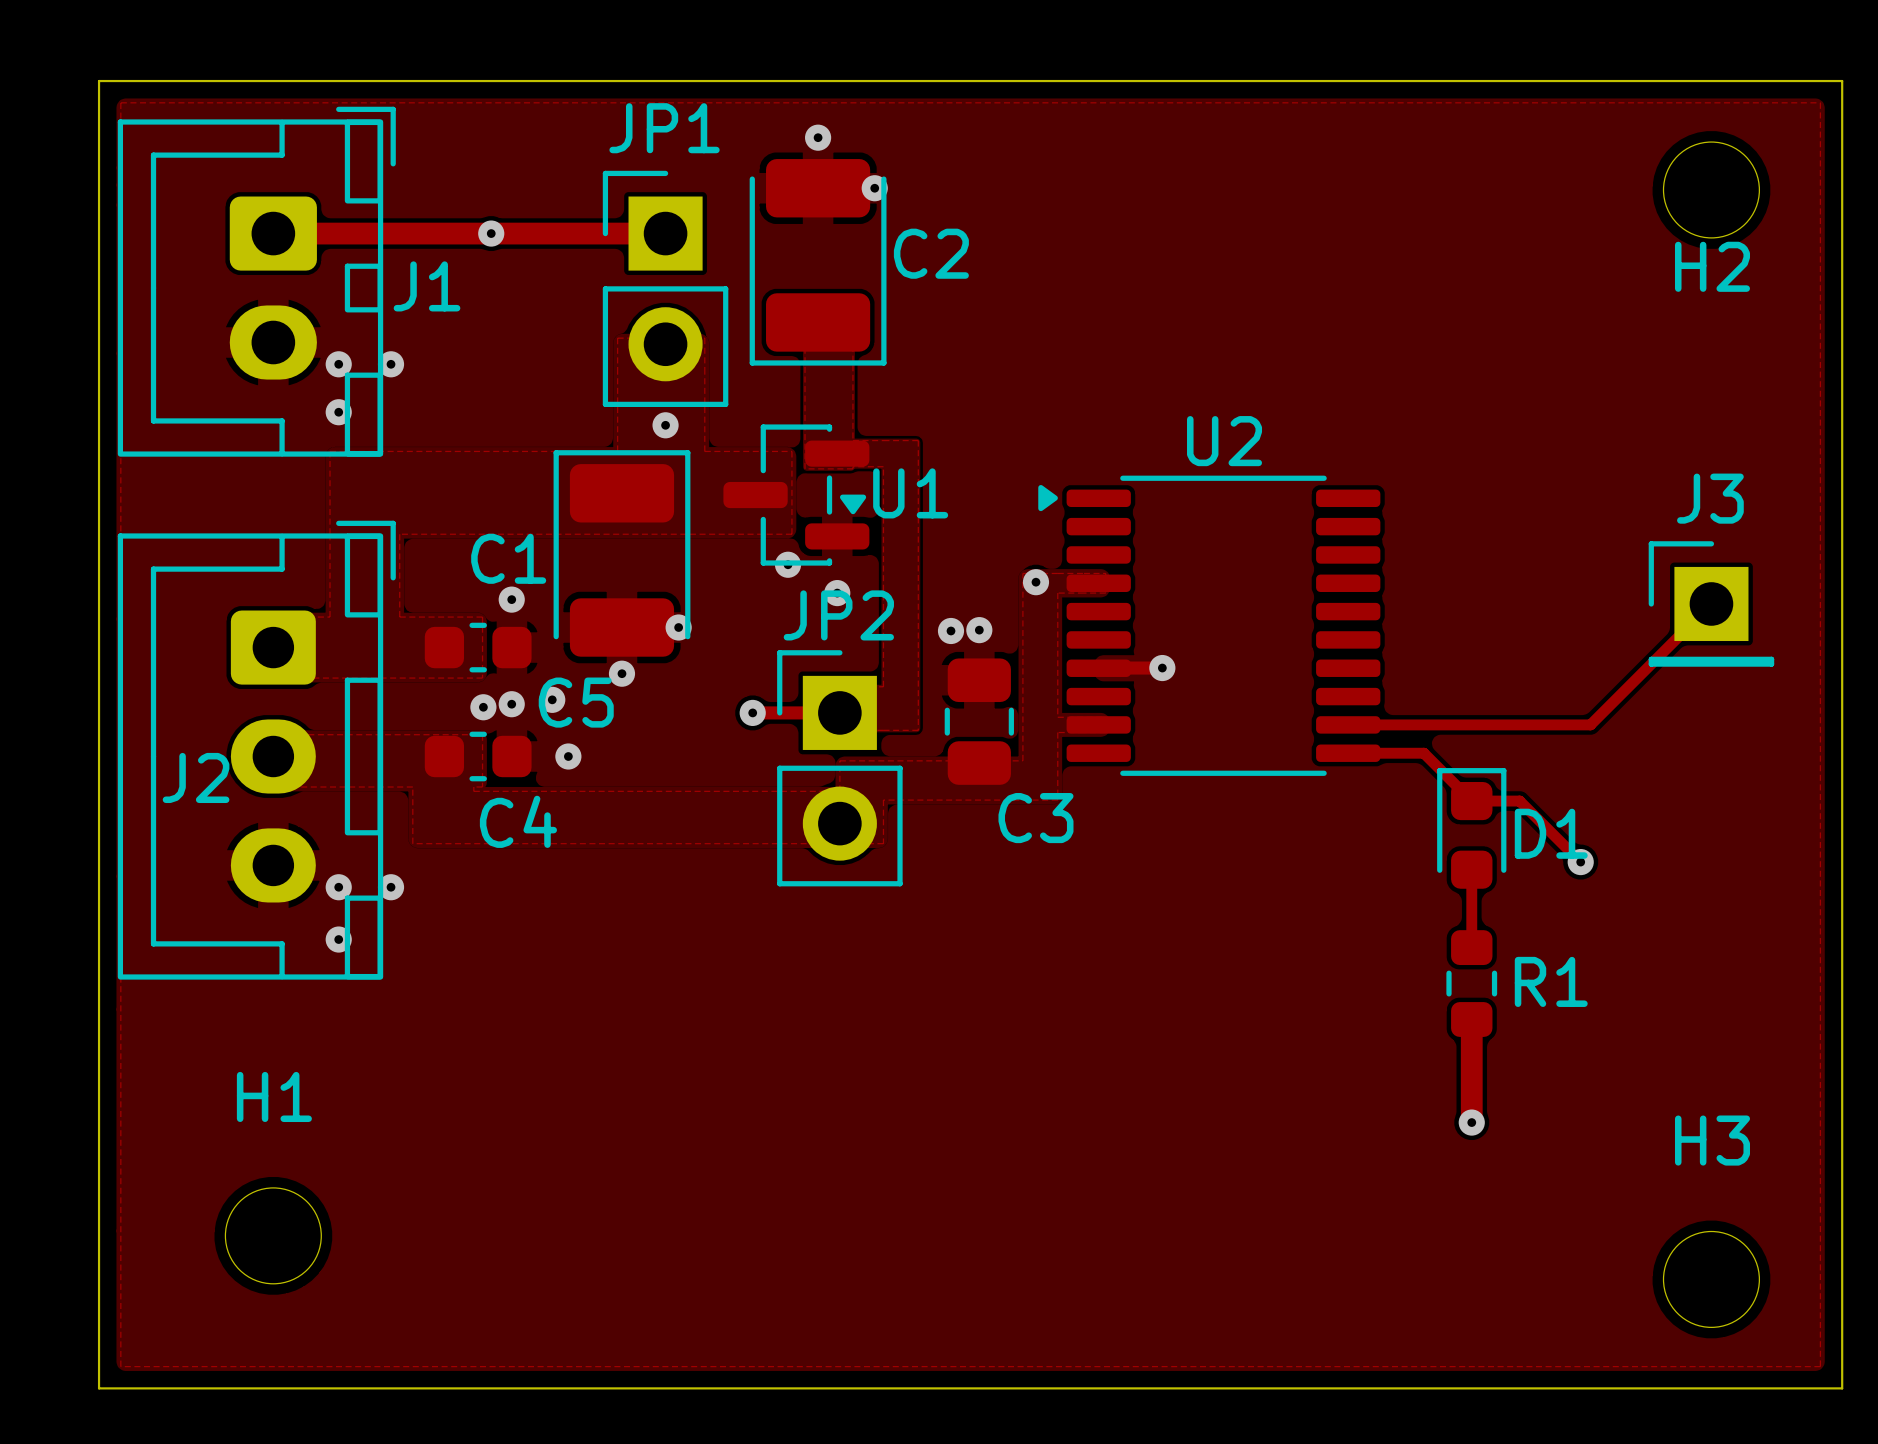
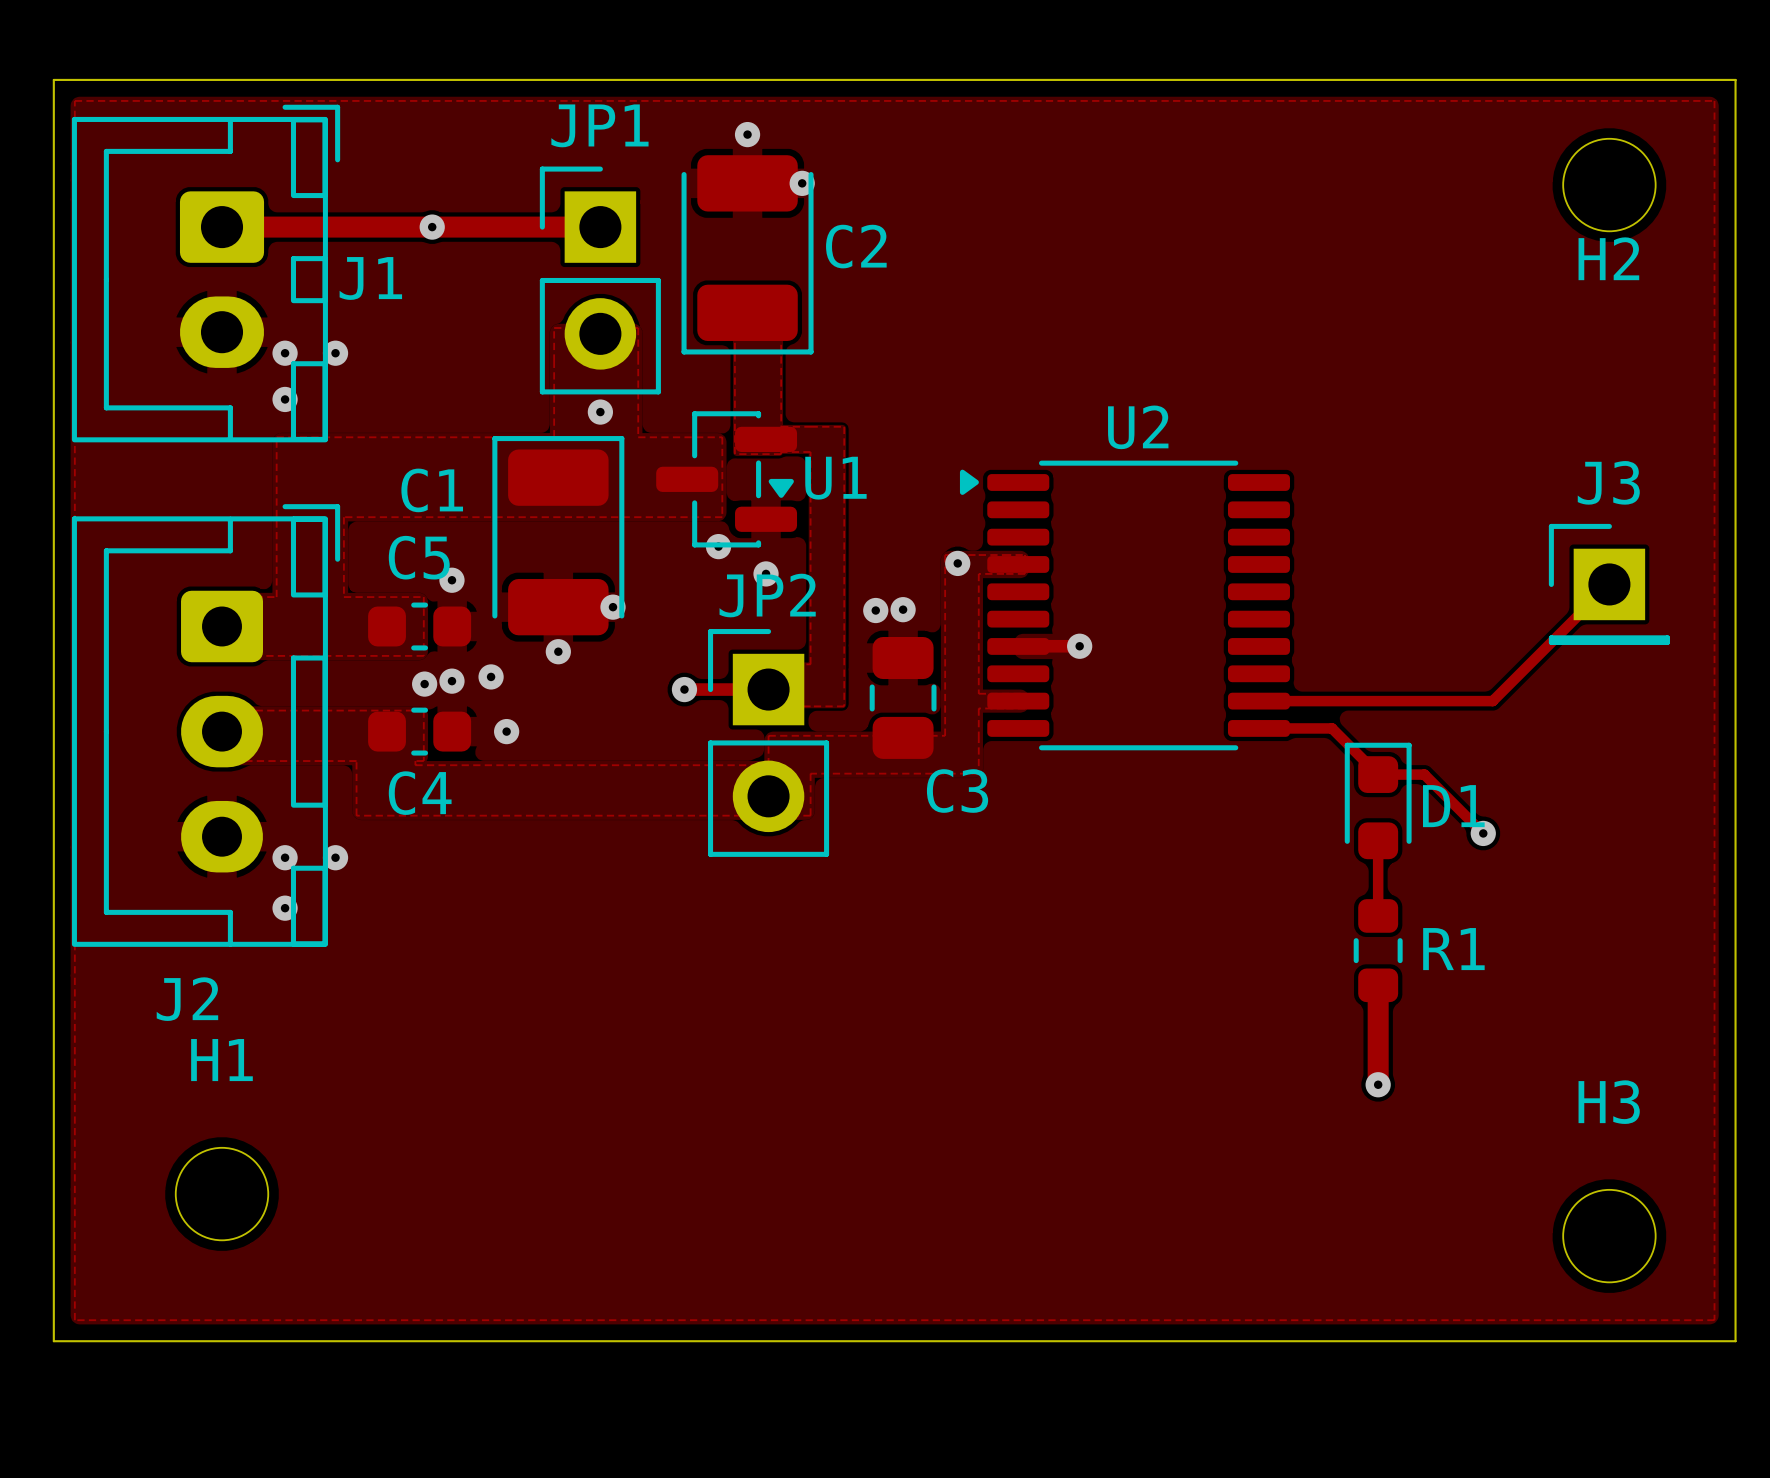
C1 name position: C1 (508, 558) -> C1 (432, 490)
C5 name position: C5 (576, 702) -> C5 (419, 557)
J2 name position: J2 (196, 777) -> J2 (187, 999)
C4 name position: C4 (518, 821) -> C4 (420, 793)

